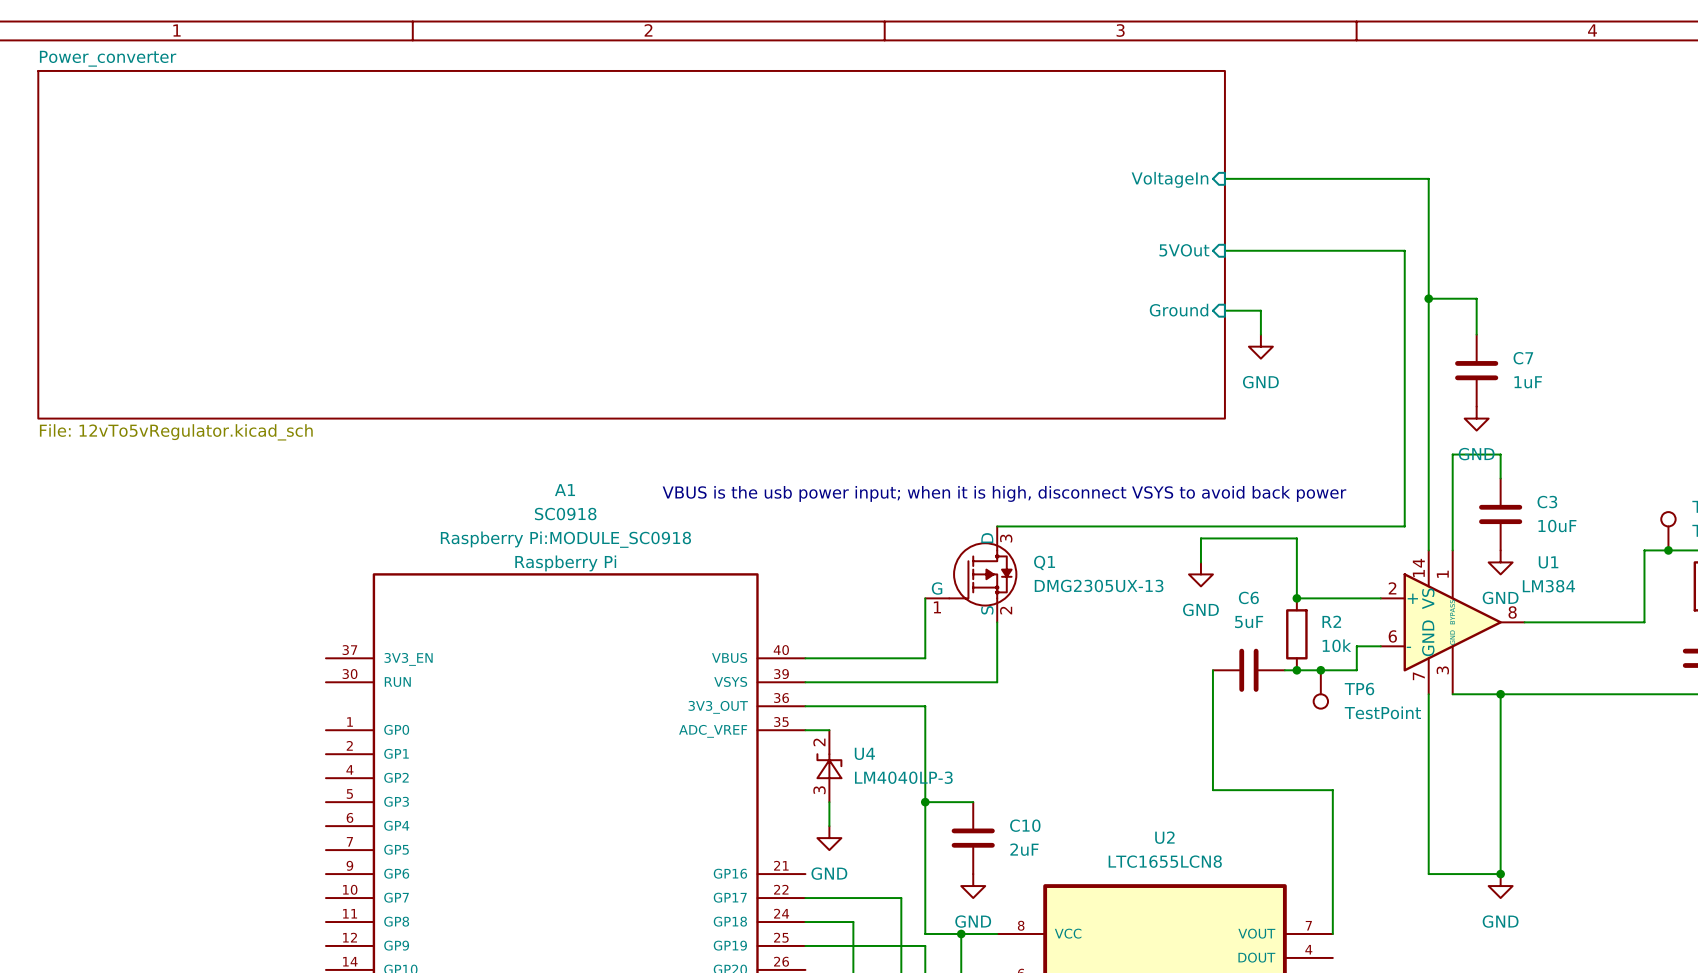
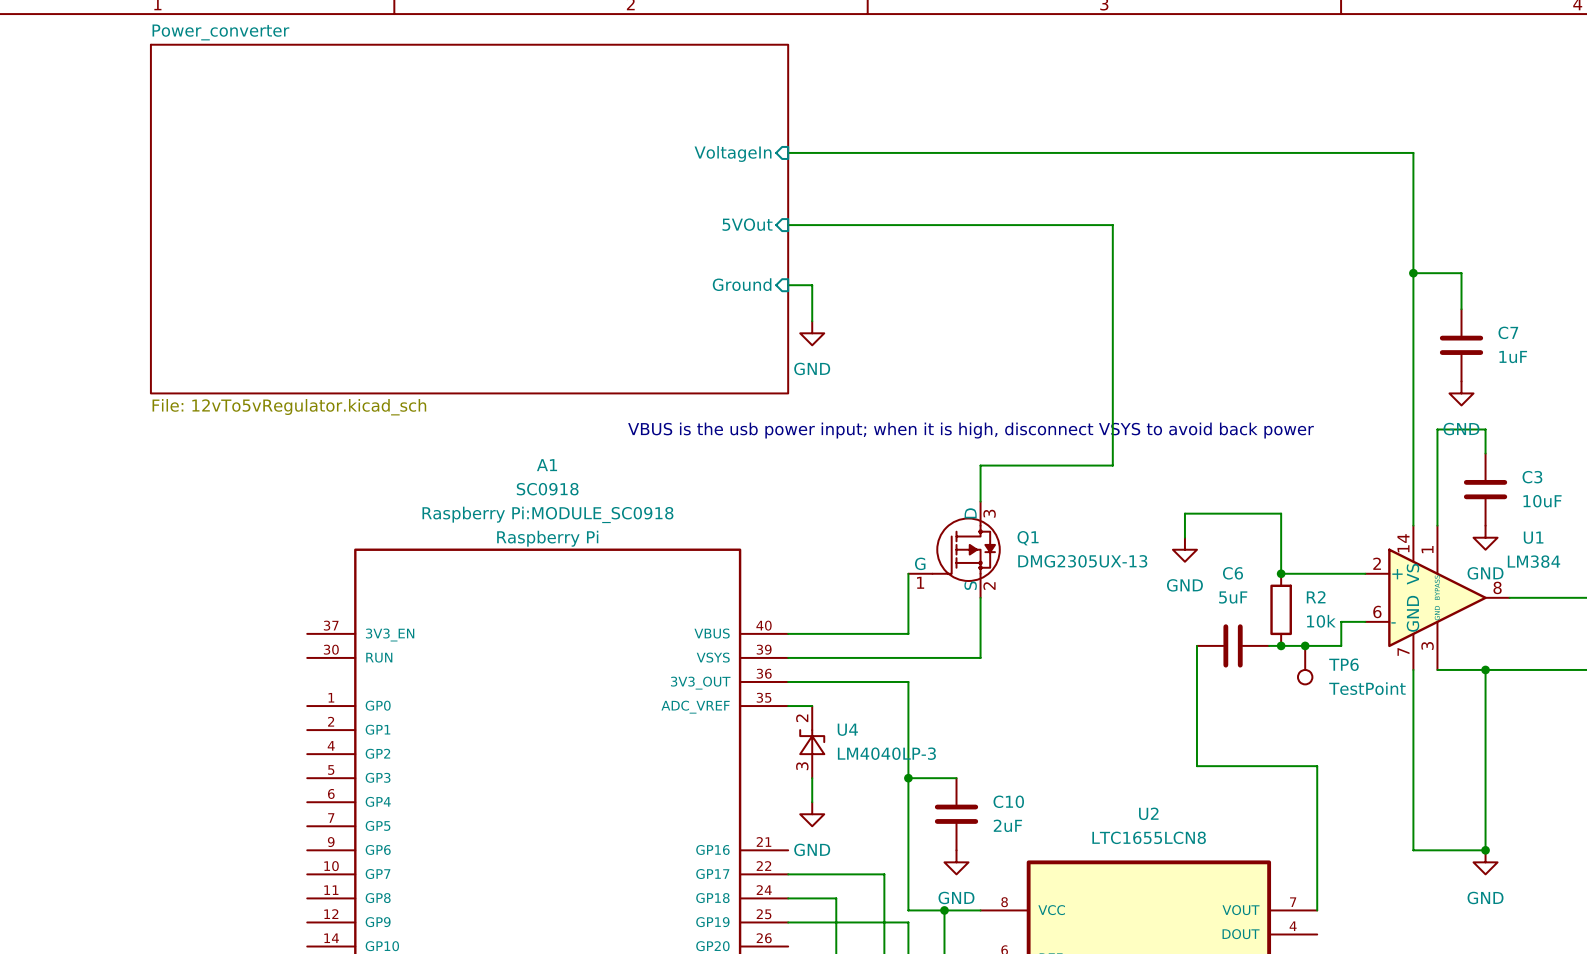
wire: none -> (788, 152) (1209, 152)
sheet pin: none -> VoltageIn (733, 153)
sheet pin: VoltageIn (1169, 179) -> none
sheet Power_converter: none -> File: 12vTo5vRegulator.kicad_sch (469, 219)
sheet Power_converter: File: 12vTo5vRegulator.kicad_sch (631, 244) -> none
sheet pin: none -> 5VOut (747, 224)
sheet pin: 5VOut (1184, 250) -> none
wire: (1224, 250) (1404, 250) (1404, 526) (997, 526) -> (788, 225) (1112, 225) (1112, 465) (980, 465) (980, 501)
sheet pin: none -> Ground (742, 284)
wire: none -> (788, 285) (812, 285) (812, 321)
sheet pin: Ground (1179, 310) -> none
wire: (1224, 310) (1260, 310) (1260, 334) -> none
power symbol: GND (1260, 346) -> none
power symbol: none -> GND (812, 333)
text position: VBUS is the usb power input; when it is high, disconnect VSYS to avoid back power (1004, 493) -> VBUS is the usb power input; when it is high, disconnect VSYS to avoid back power (971, 430)

